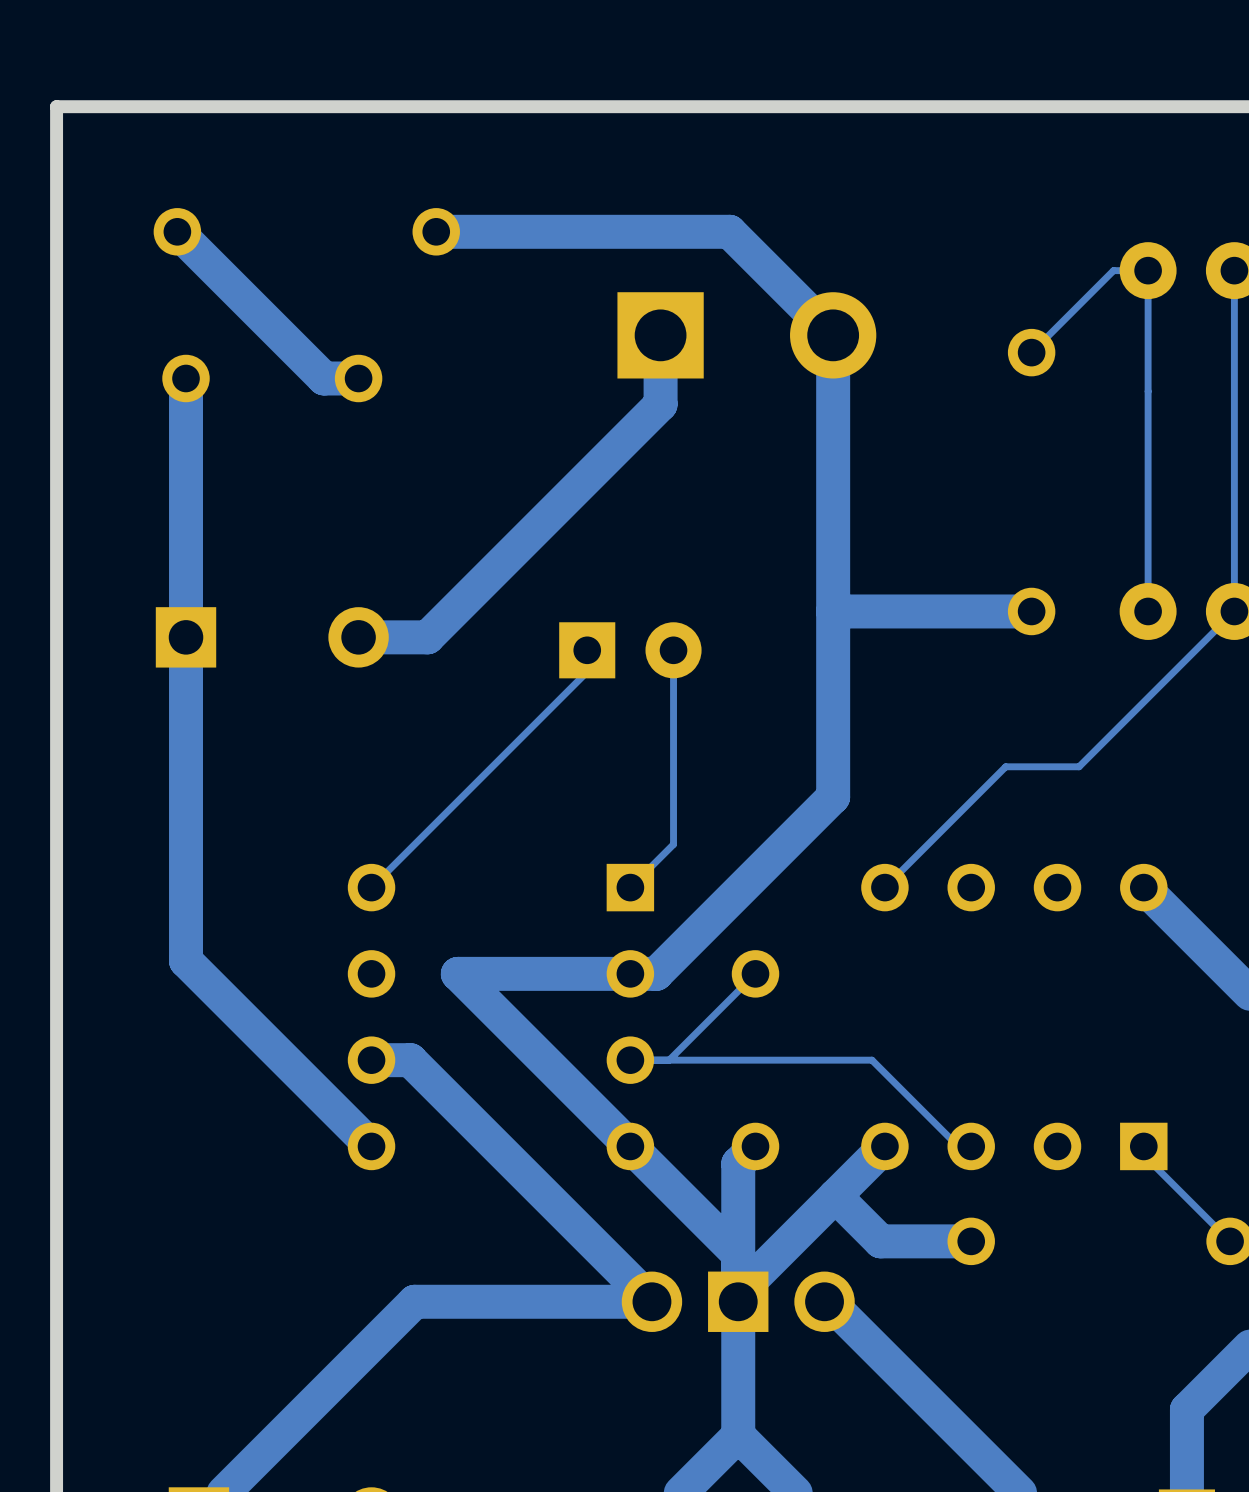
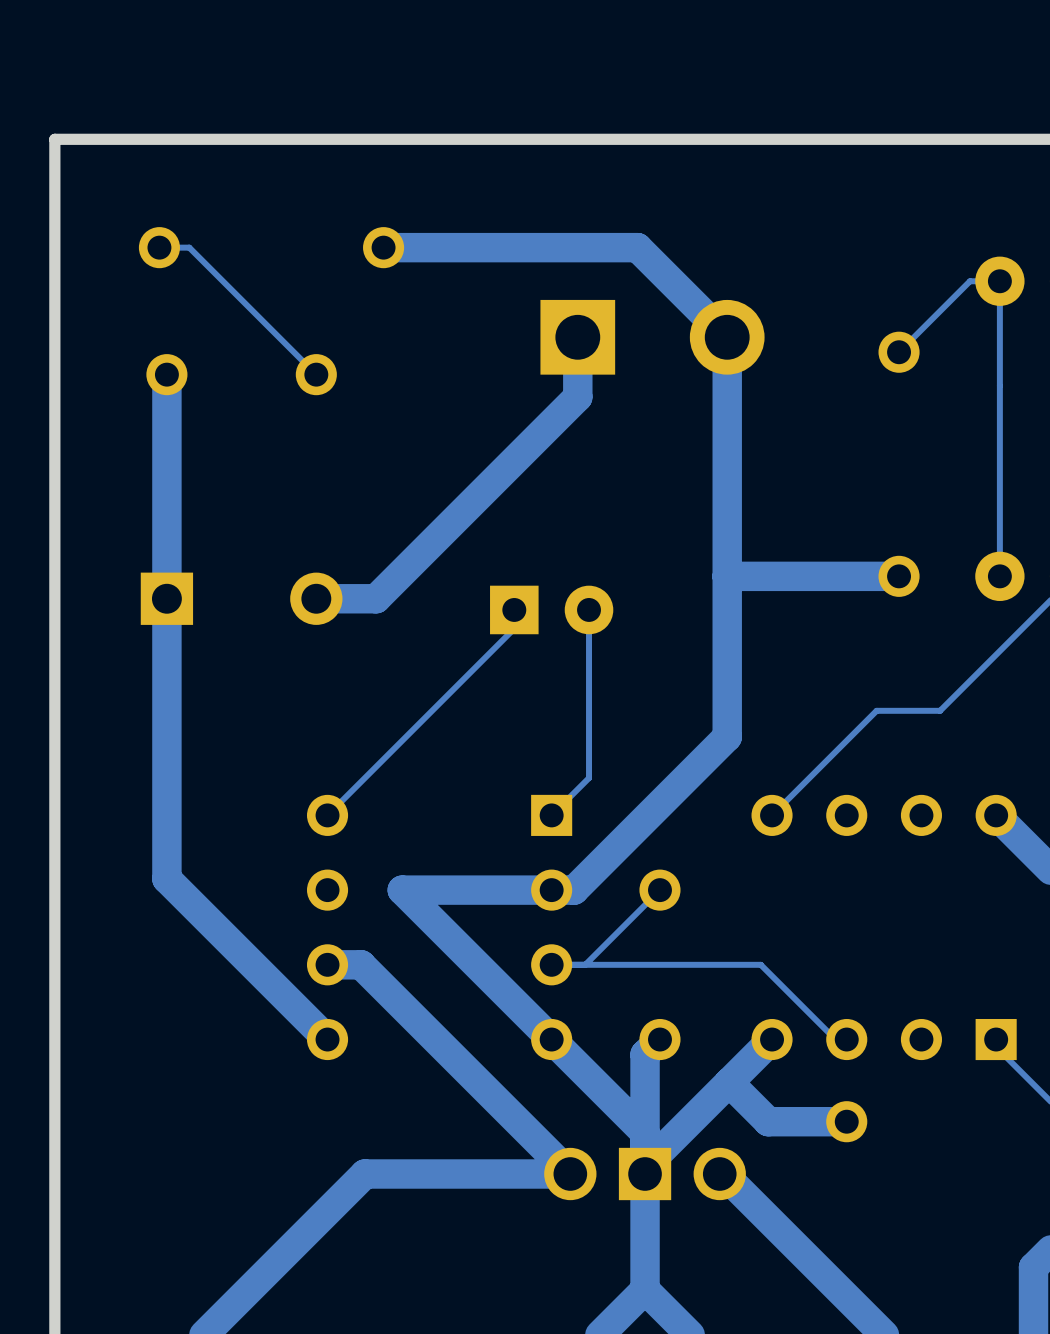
track: (177, 231) (324, 378) (358, 378) -> (159, 247) (189, 247) (316, 374)

